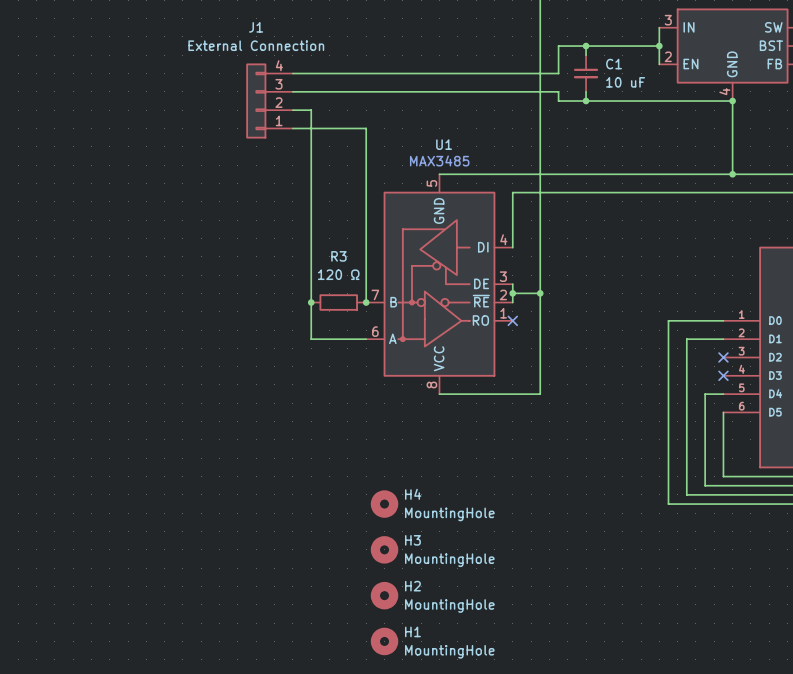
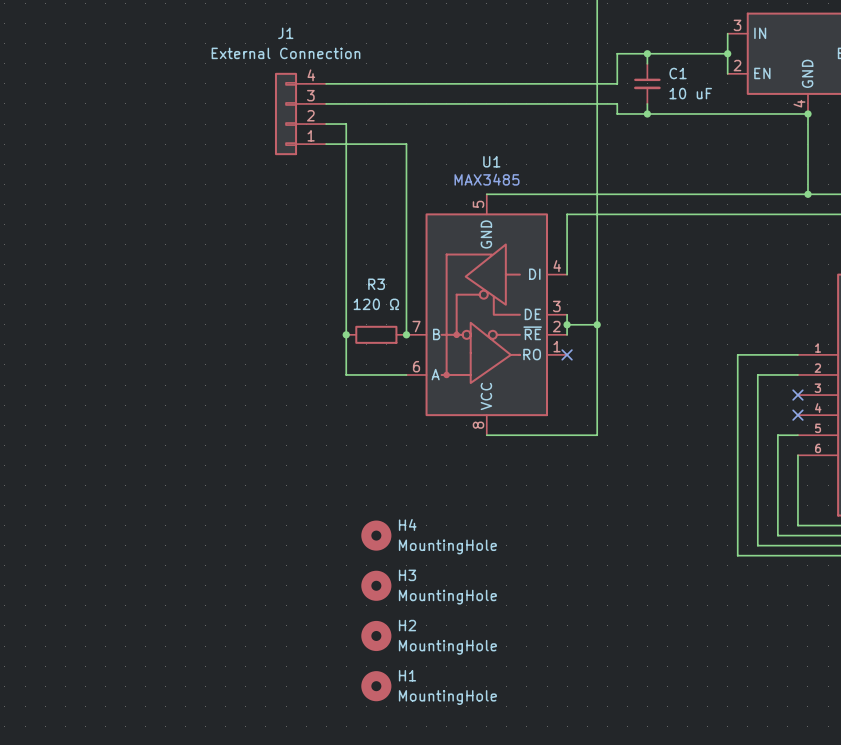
H4 position: (384, 504) -> (376, 535)
H3 position: (384, 549) -> (376, 585)
H2 position: (384, 595) -> (376, 635)
H1 position: (384, 641) -> (376, 686)

